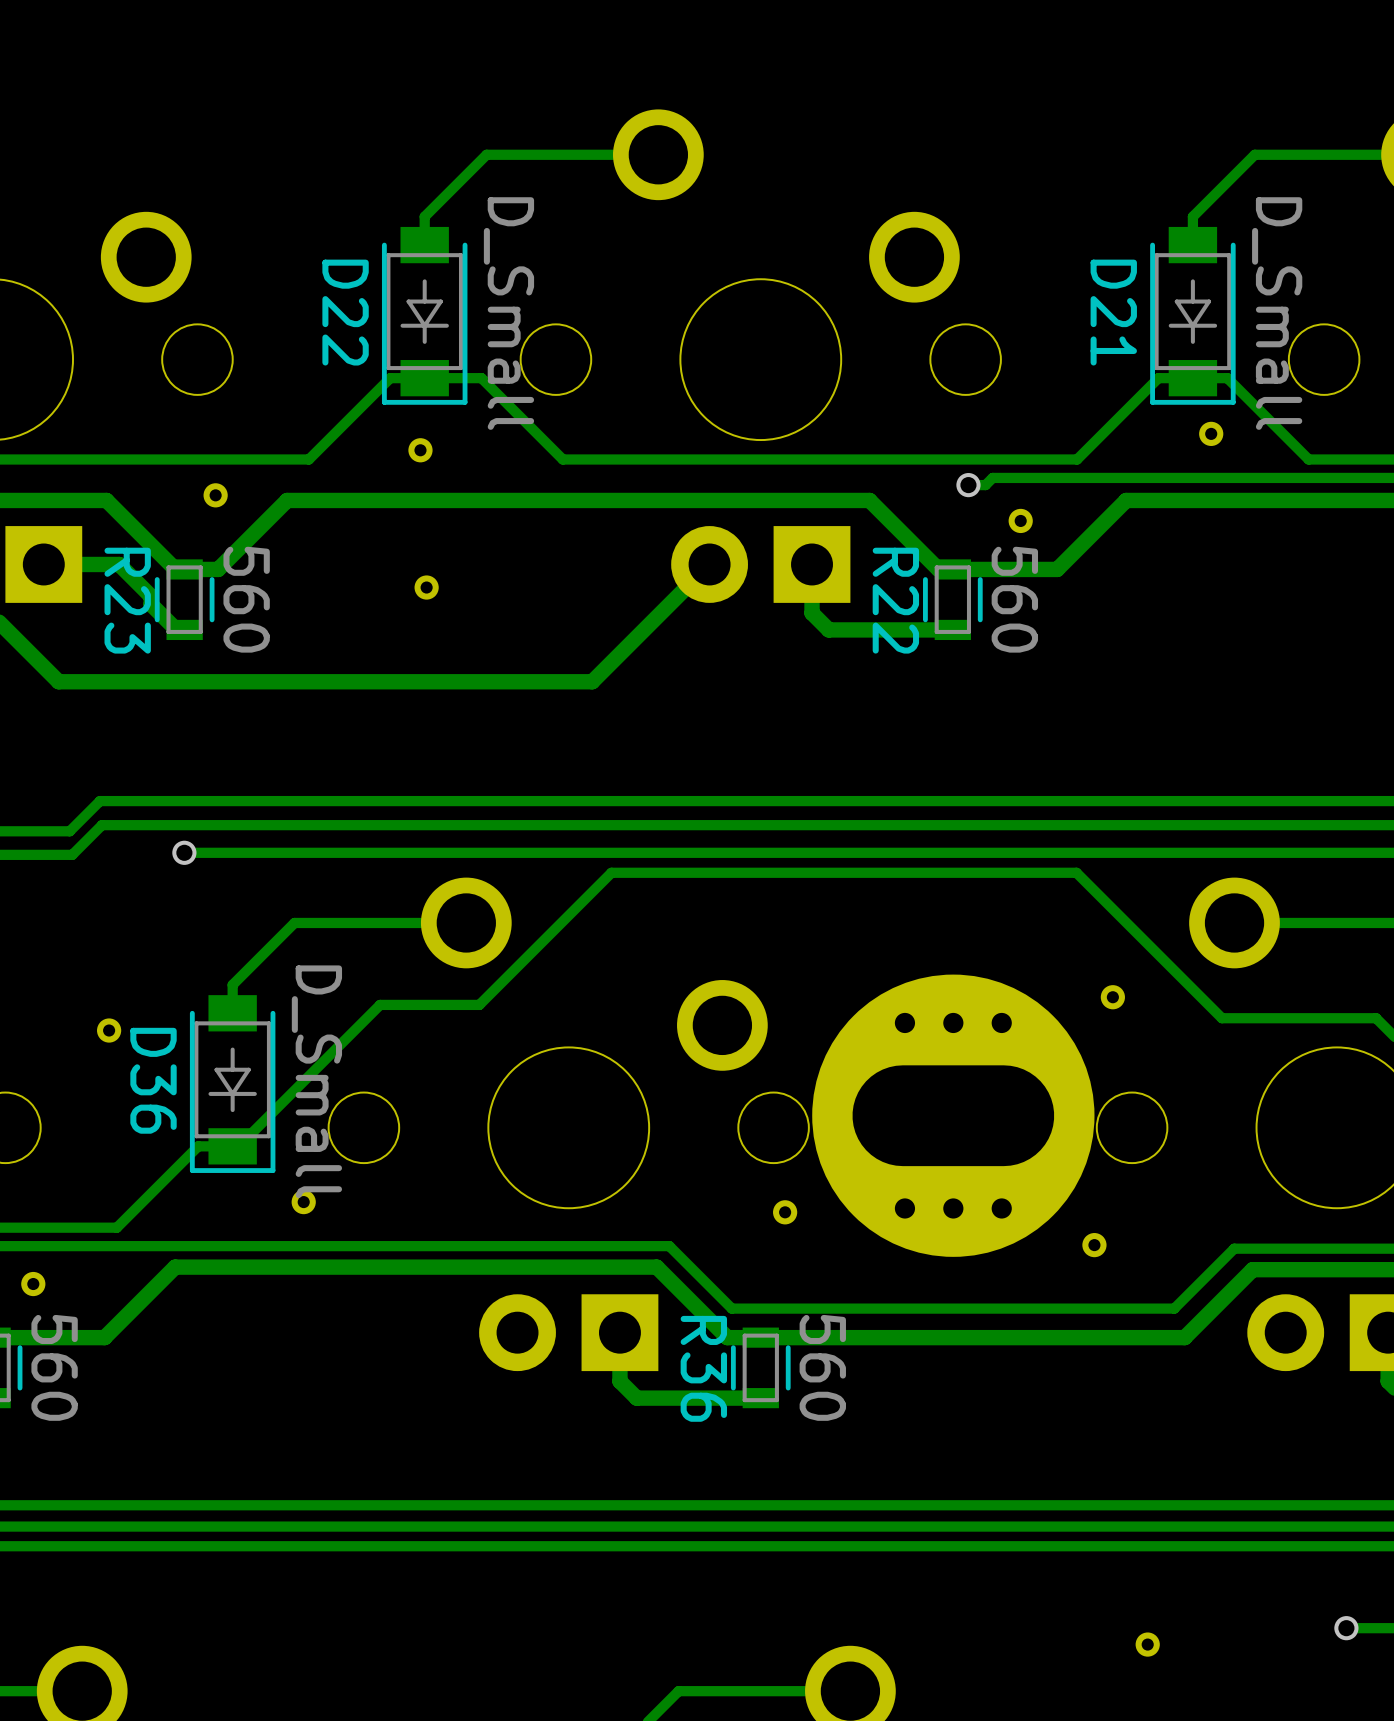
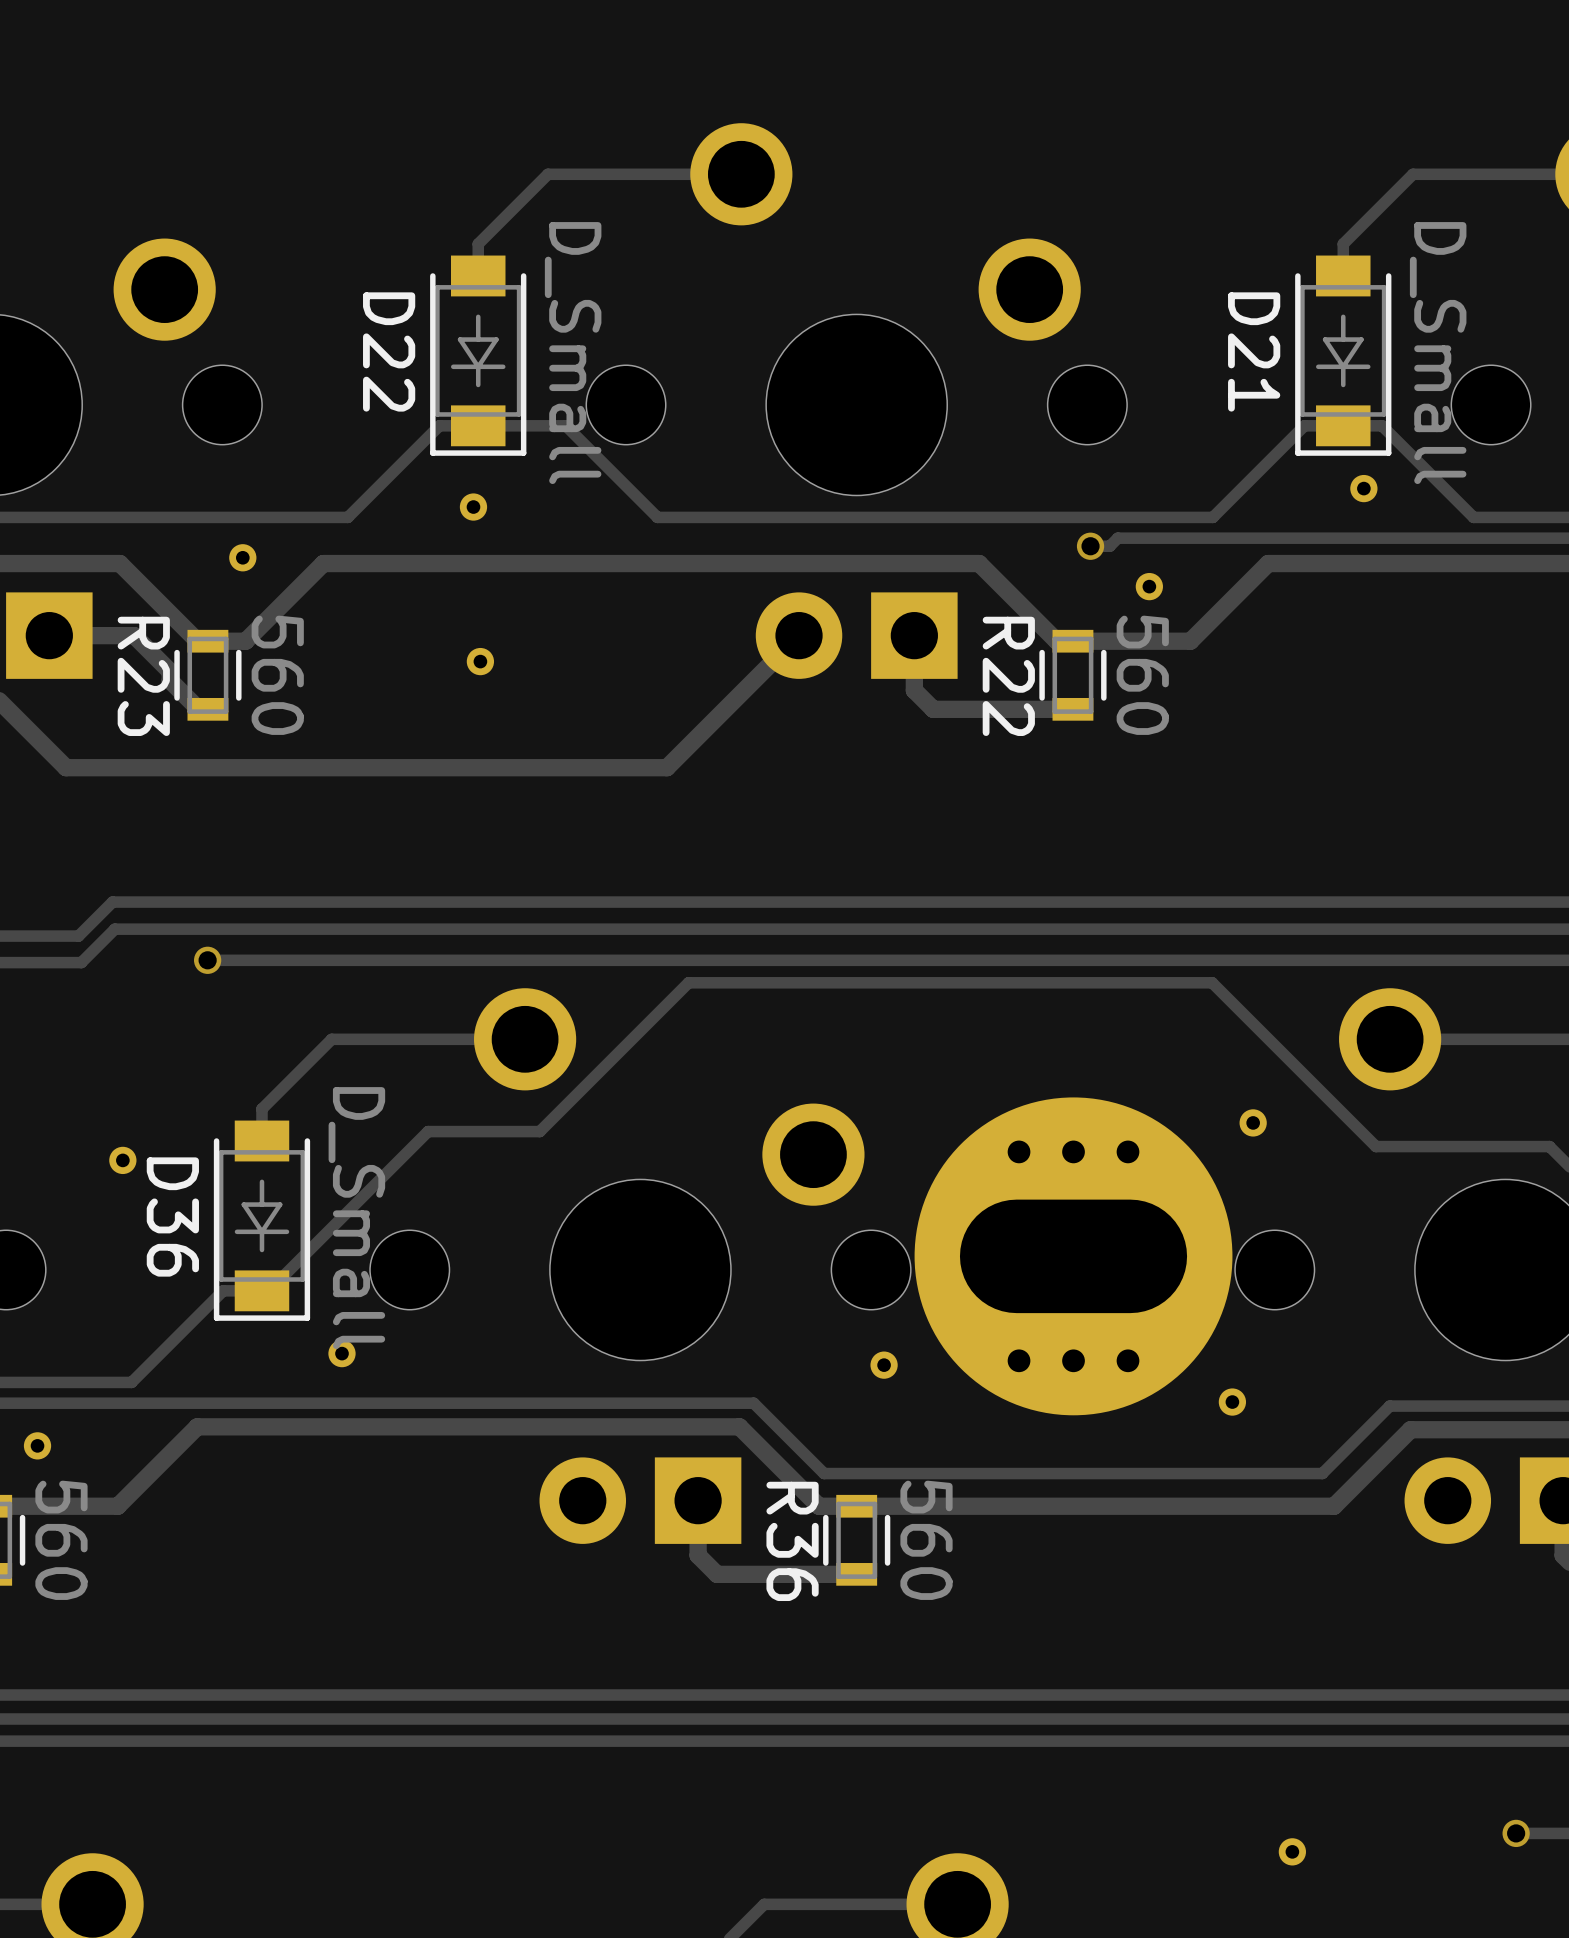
track: (481, 378) (562, 459) (583, 459) -> (542, 425) (565, 425) (657, 517)

